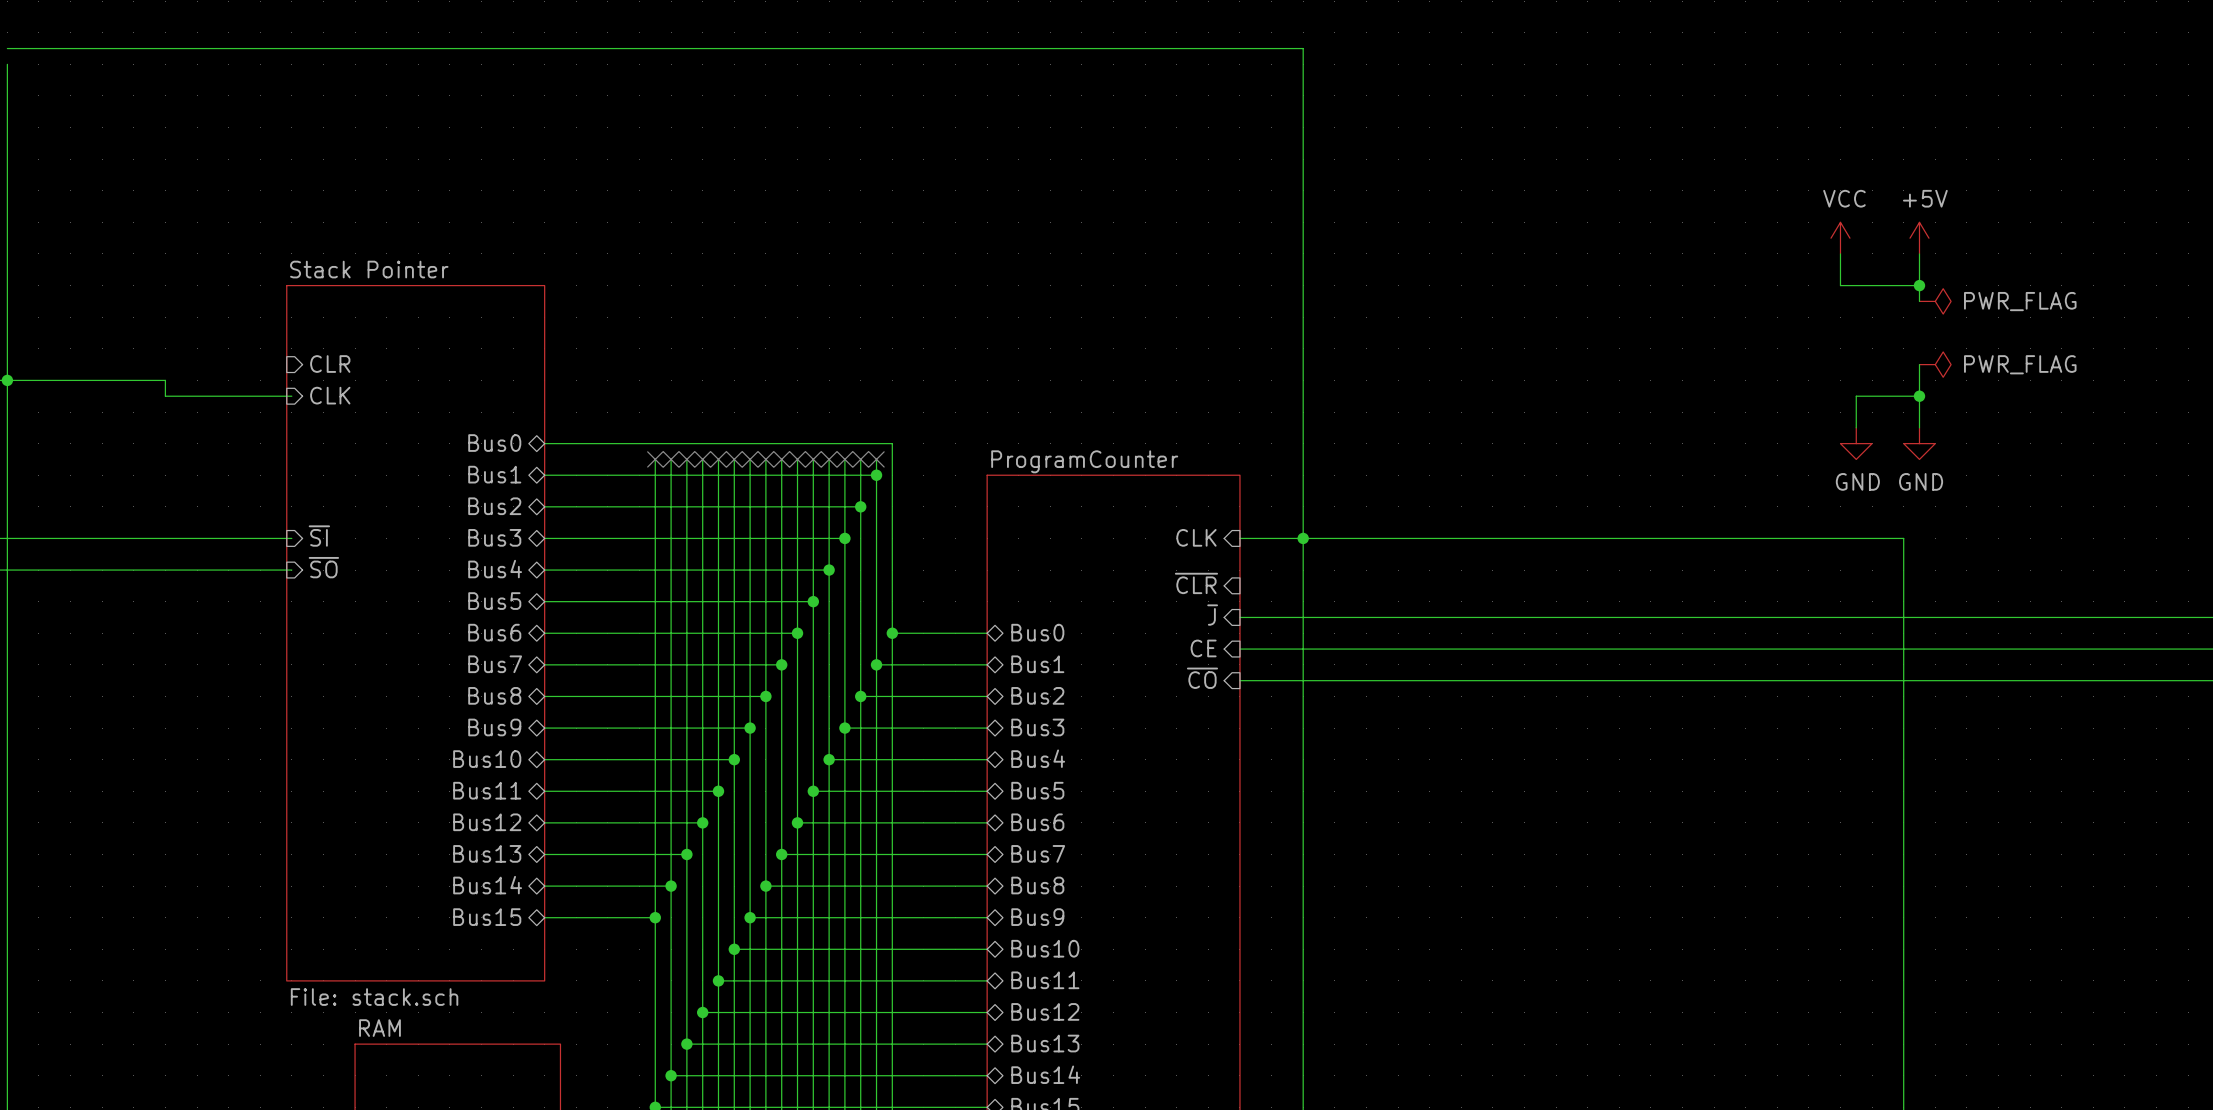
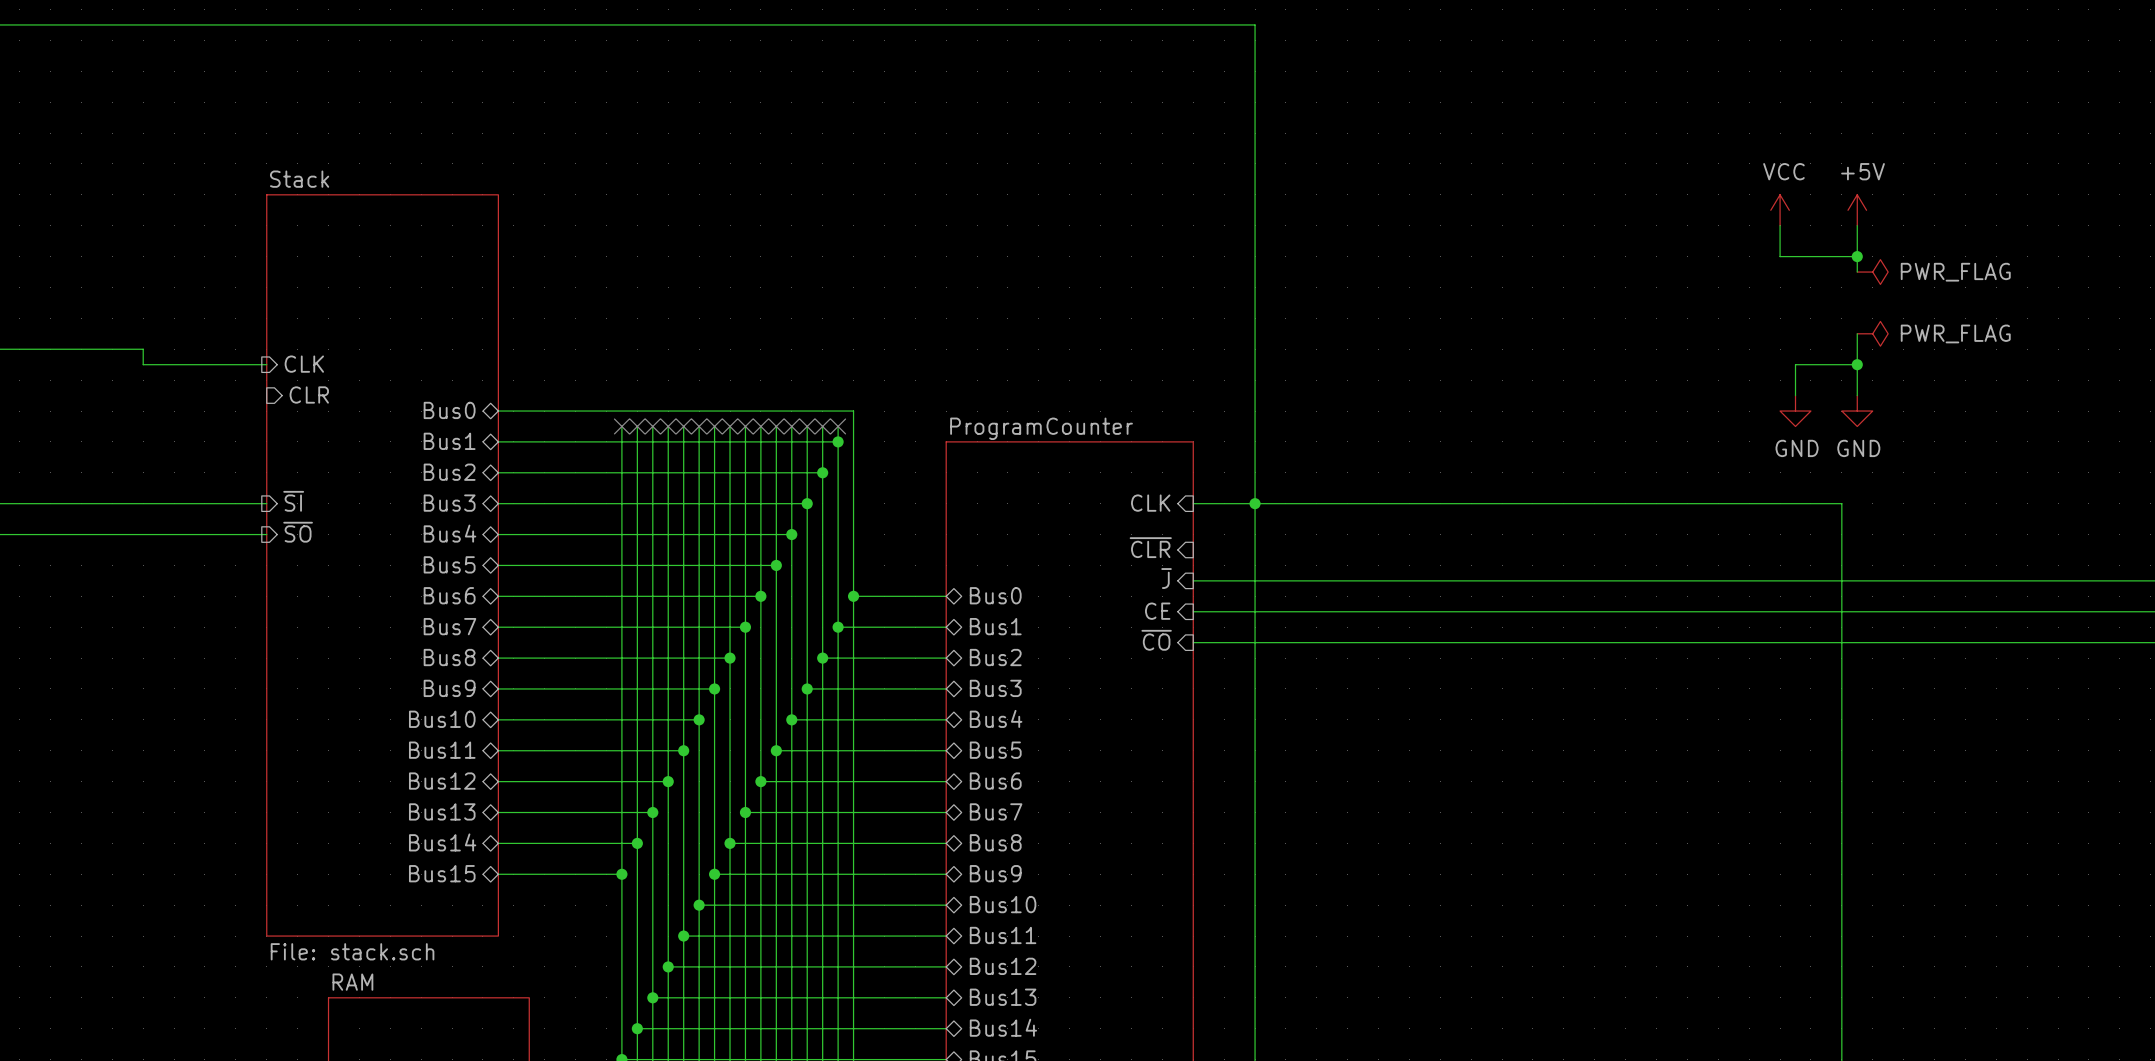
sheet pin position: CLR (330, 364) -> CLR (309, 395)
sheet pin position: Bus0 (494, 443) -> Bus0 (449, 410)
wire: none -> (498, 411) (513, 411)
sheet pin position: Bus1 (494, 474) -> Bus1 (449, 441)
wire: none -> (498, 441) (513, 441)
sheet pin position: Bus2 (494, 506) -> Bus2 (449, 472)
wire: none -> (498, 472) (513, 472)
sheet pin position: Bus3 (494, 537) -> Bus3 (449, 503)
wire: none -> (498, 503) (513, 503)
sheet pin position: Bus4 (495, 569) -> Bus4 (449, 533)
wire: none -> (498, 534) (513, 534)
sheet Stack: none -> File: stack.sch (382, 565)
sheet pin position: Bus5 (494, 601) -> Bus5 (449, 564)
wire: none -> (498, 565) (513, 565)
sheet pin position: Bus6 (494, 632) -> Bus6 (449, 595)
sheet Stack Pointer: File: stack.sch (415, 633) -> none
wire: none -> (498, 596) (513, 596)
sheet pin position: Bus7 (495, 664) -> Bus7 (449, 626)
wire: none -> (498, 627) (513, 627)
sheet pin position: Bus8 (494, 695) -> Bus8 (449, 657)
wire: none -> (498, 658) (513, 658)
sheet pin position: Bus9 (494, 727) -> Bus9 (449, 688)
wire: none -> (498, 688) (513, 688)
sheet pin position: Bus10 (487, 759) -> Bus10 (442, 719)
wire: none -> (498, 719) (513, 719)
sheet pin position: Bus11 (487, 790) -> Bus11 (442, 750)
wire: none -> (498, 750) (513, 750)
sheet pin position: Bus12 (487, 822) -> Bus12 (442, 781)
wire: none -> (498, 781) (513, 781)
sheet pin position: Bus13 (487, 853) -> Bus13 (442, 811)
wire: none -> (498, 812) (513, 812)
sheet pin position: Bus14 (487, 885) -> Bus14 (442, 842)
wire: none -> (498, 843) (513, 843)
sheet pin position: Bus15 (487, 917) -> Bus15 (442, 873)
wire: none -> (498, 874) (513, 874)

